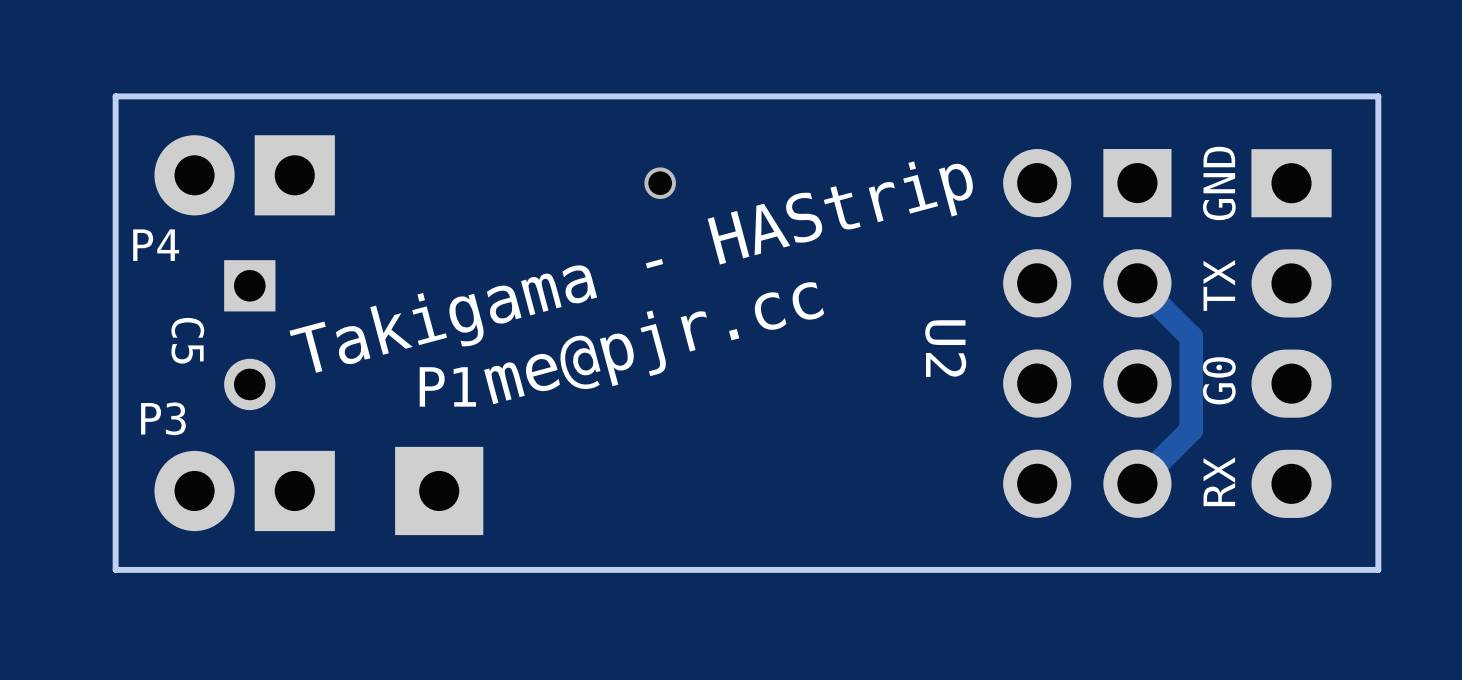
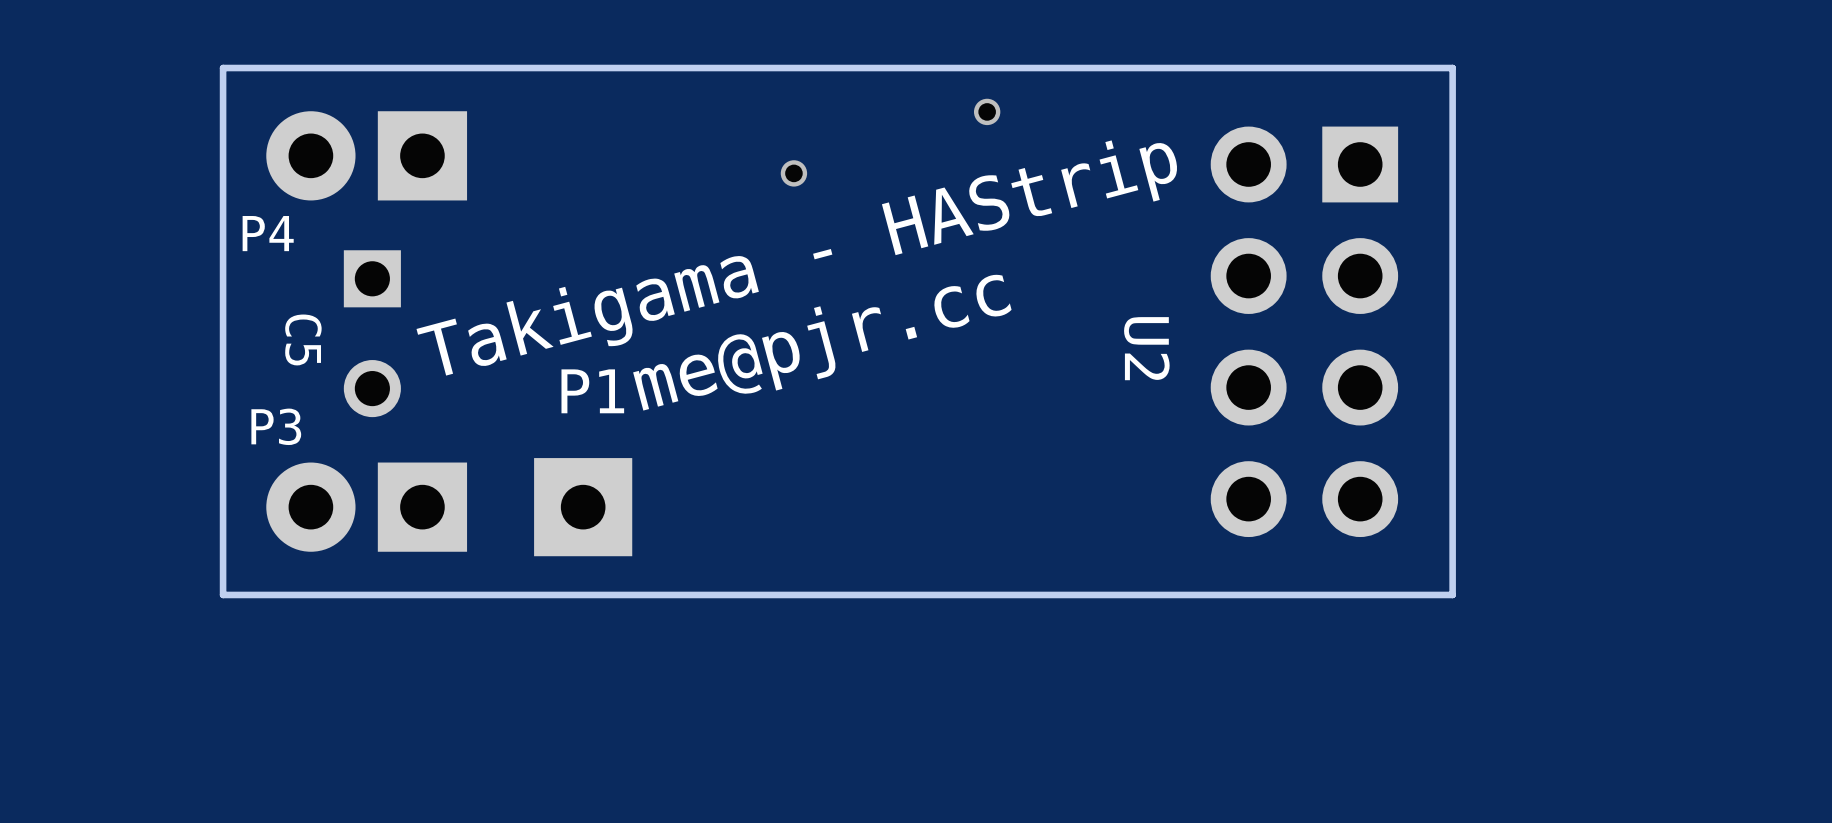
board edge: (1220, 96) (1378, 96) (1378, 569) (1220, 569) -> (1452, 68) (1452, 594)
via: none -> (987, 111)
via: (660, 183) -> none
text: GND (1219, 183) -> none
via: none -> (793, 173)
track: (1137, 283) (1191, 337) (1191, 429) (1137, 483) -> none
text: TX (1219, 285) -> none
part: (1291, 333) -> none
text: G0 (1219, 380) -> none
text: RX (1219, 481) -> none

